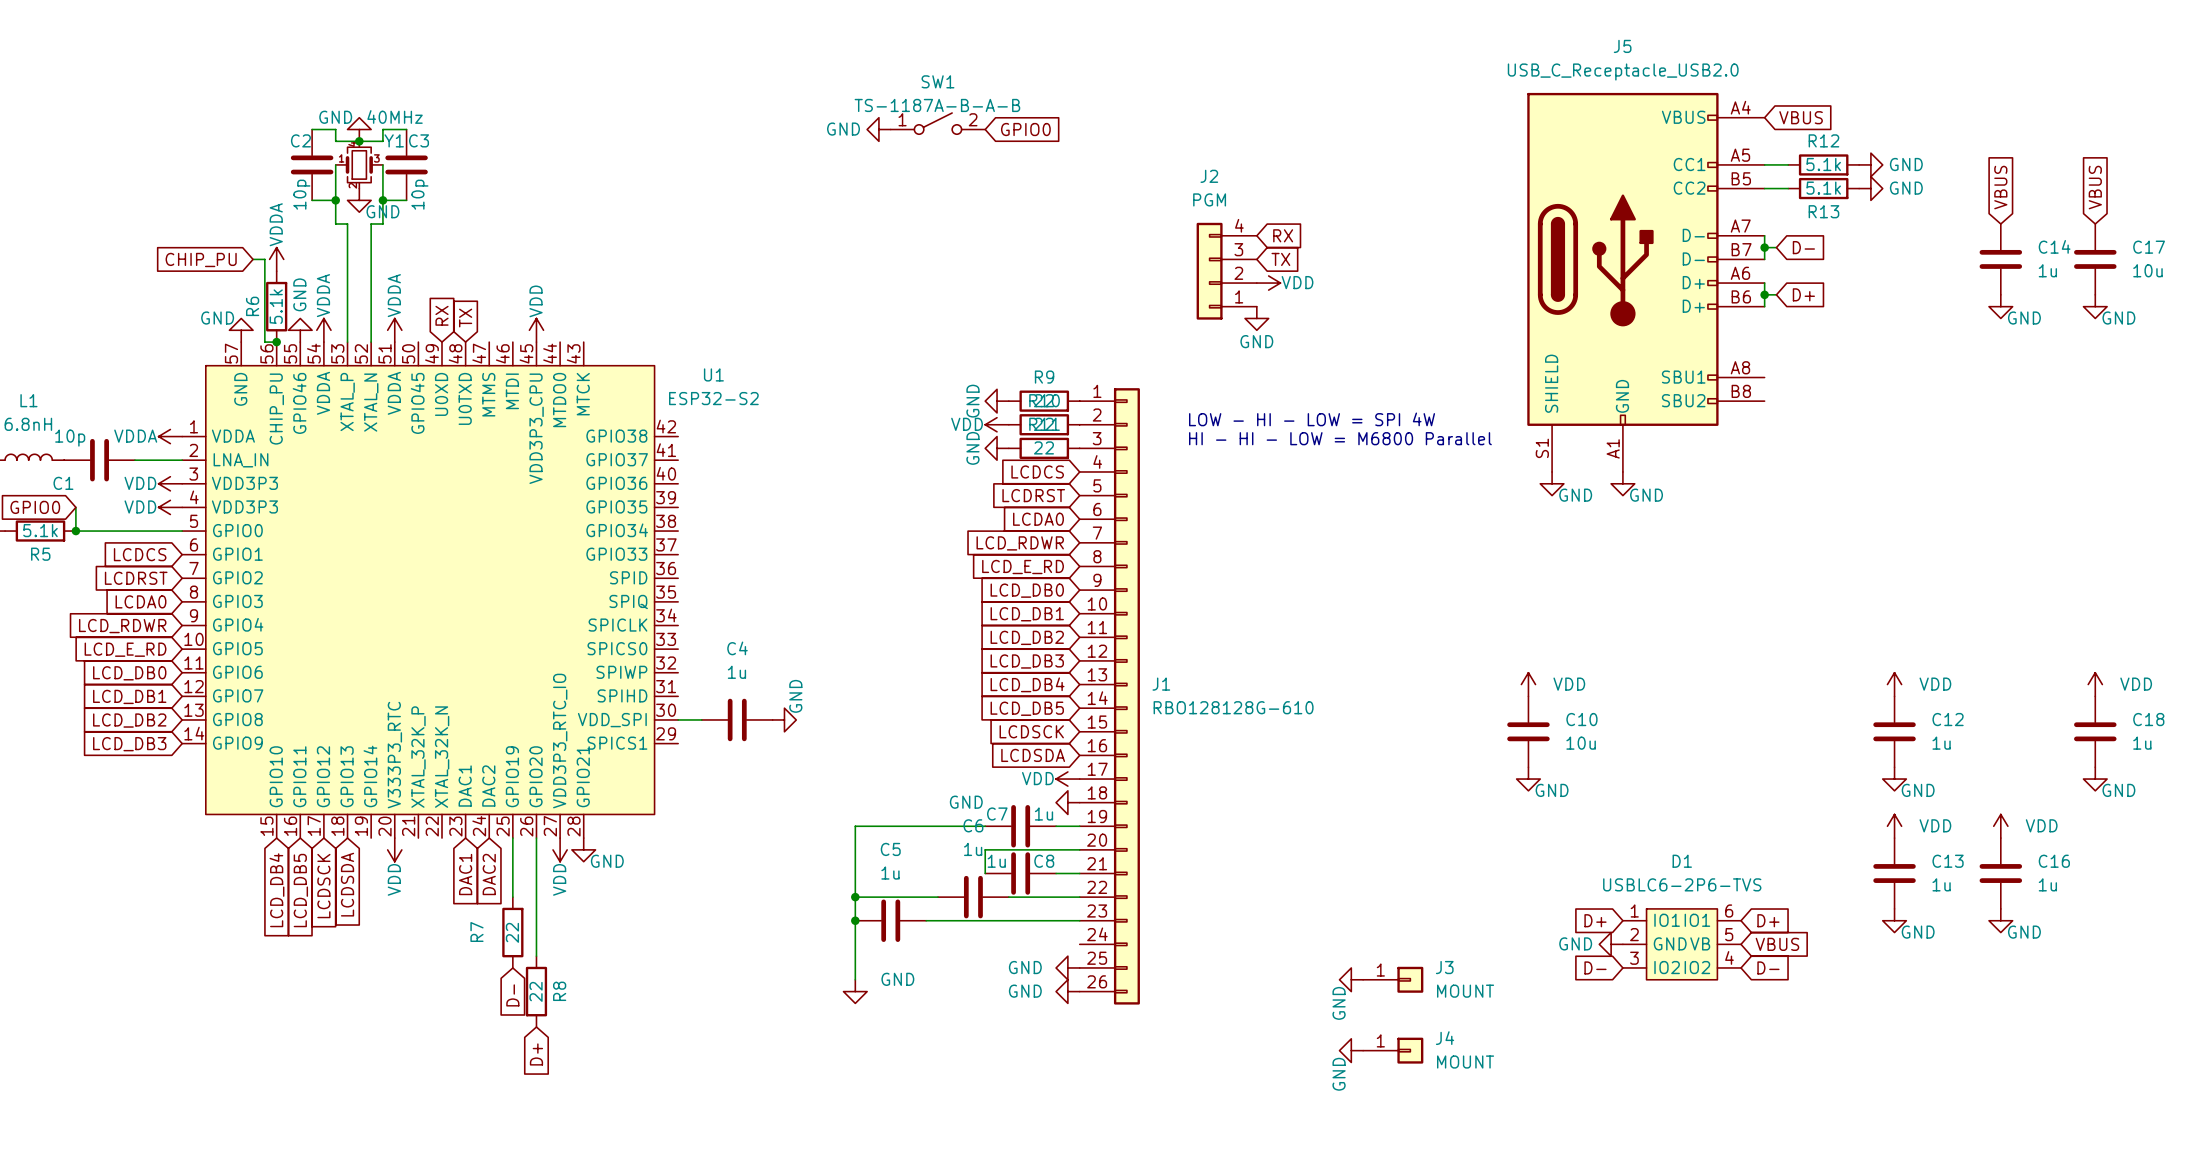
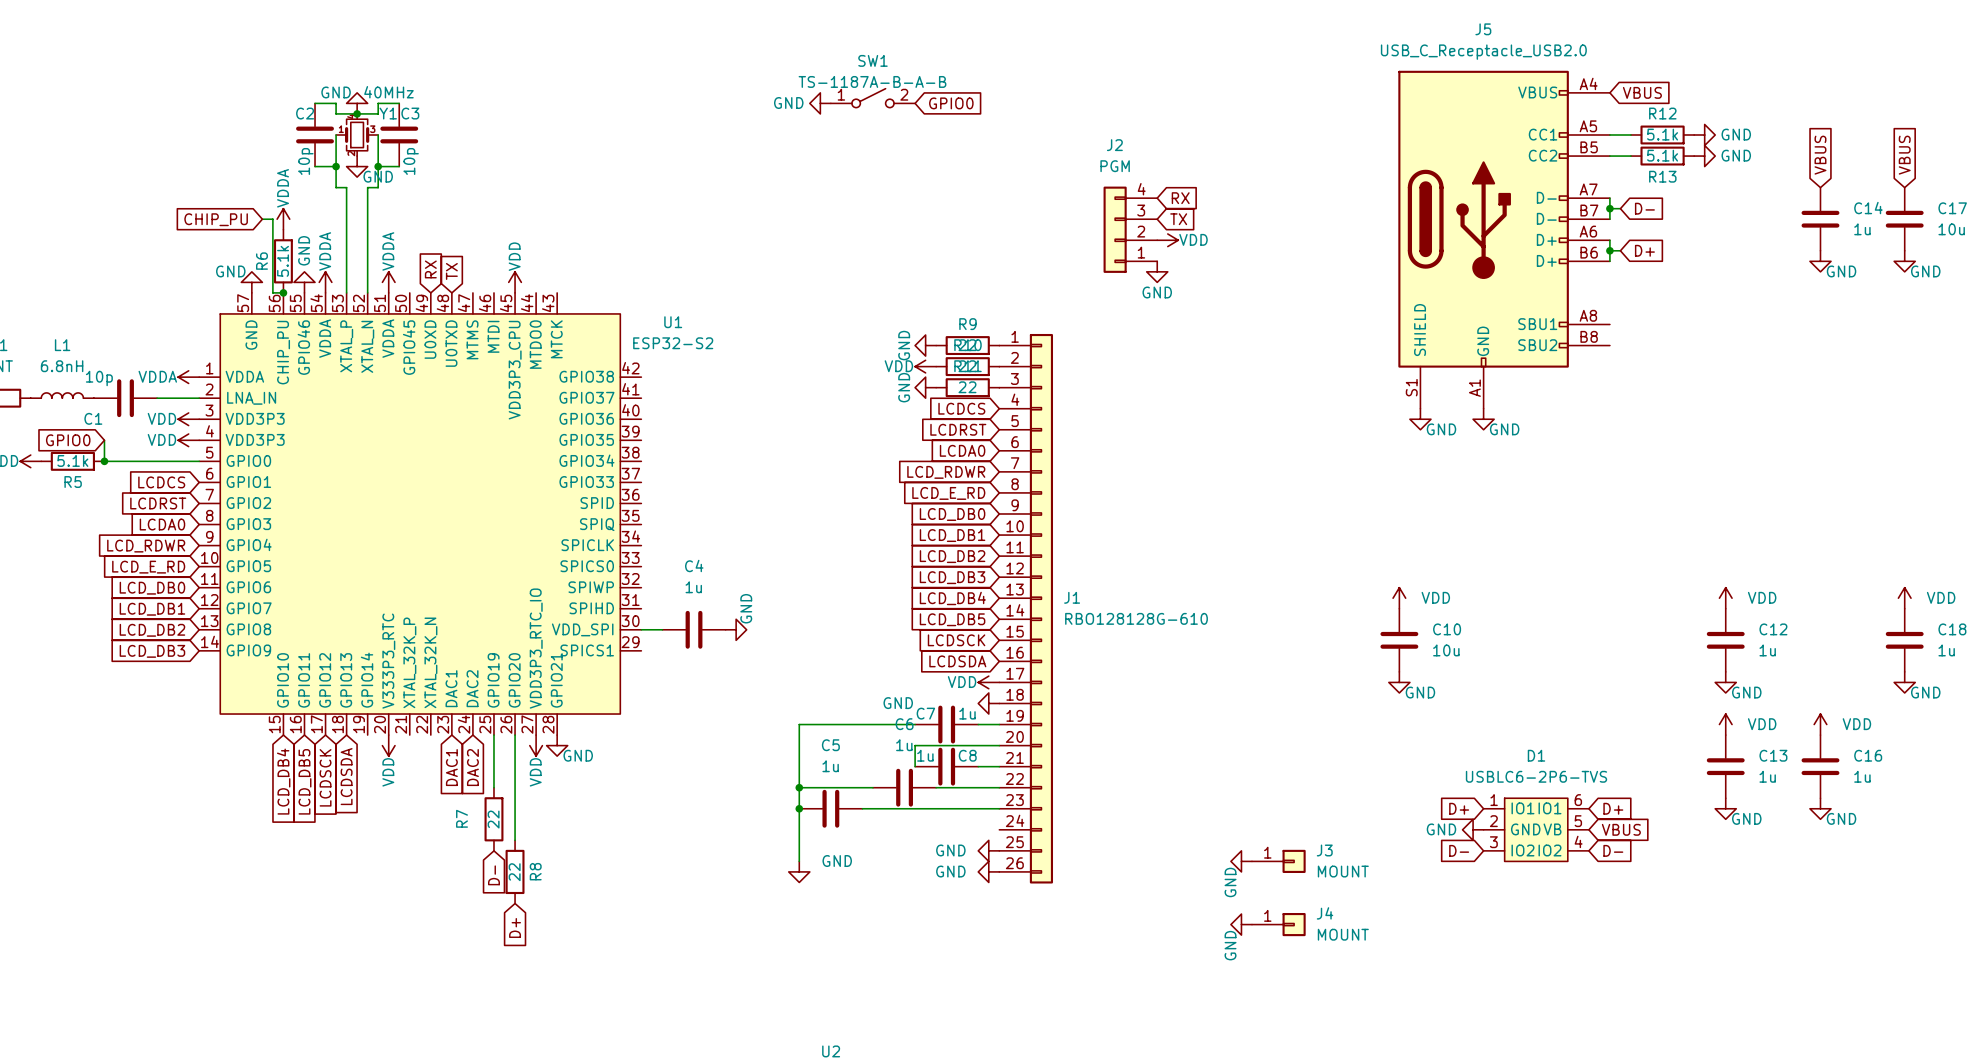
text: LOW - HI - LOW = SPI 4W (1312, 419) -> none
text: HI - HI - LOW = M6800 Parallel (1340, 438) -> none

